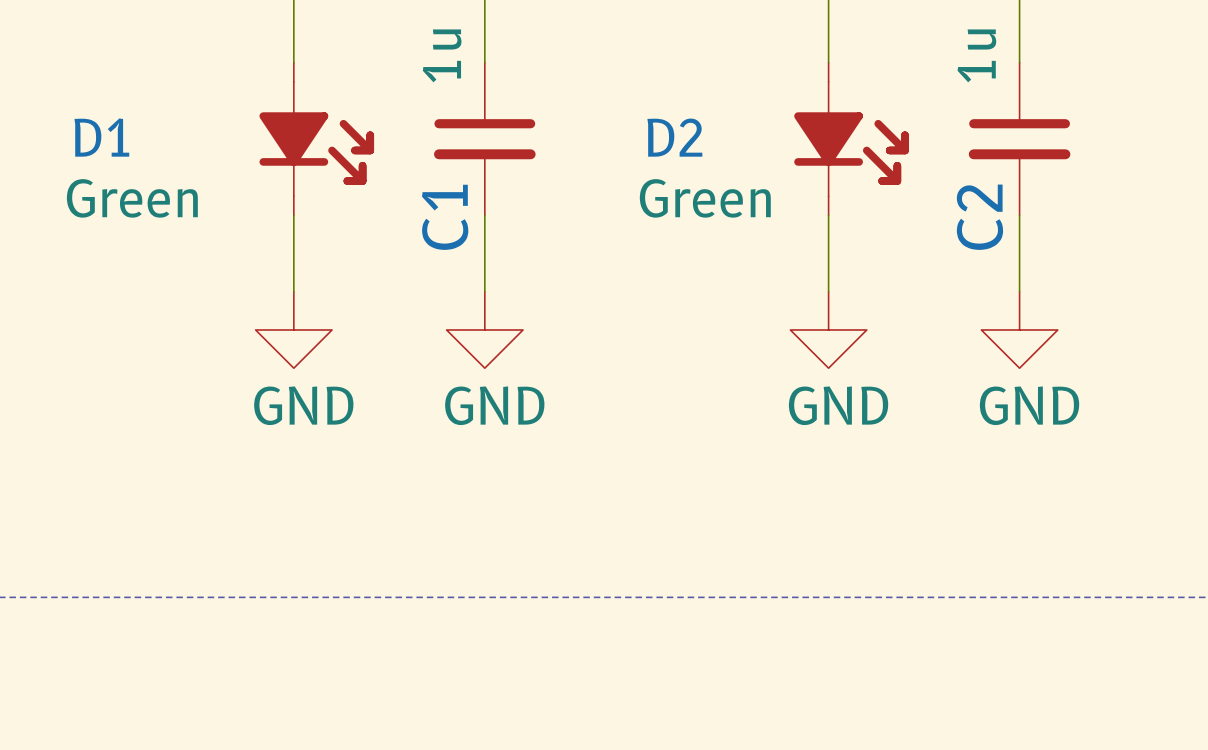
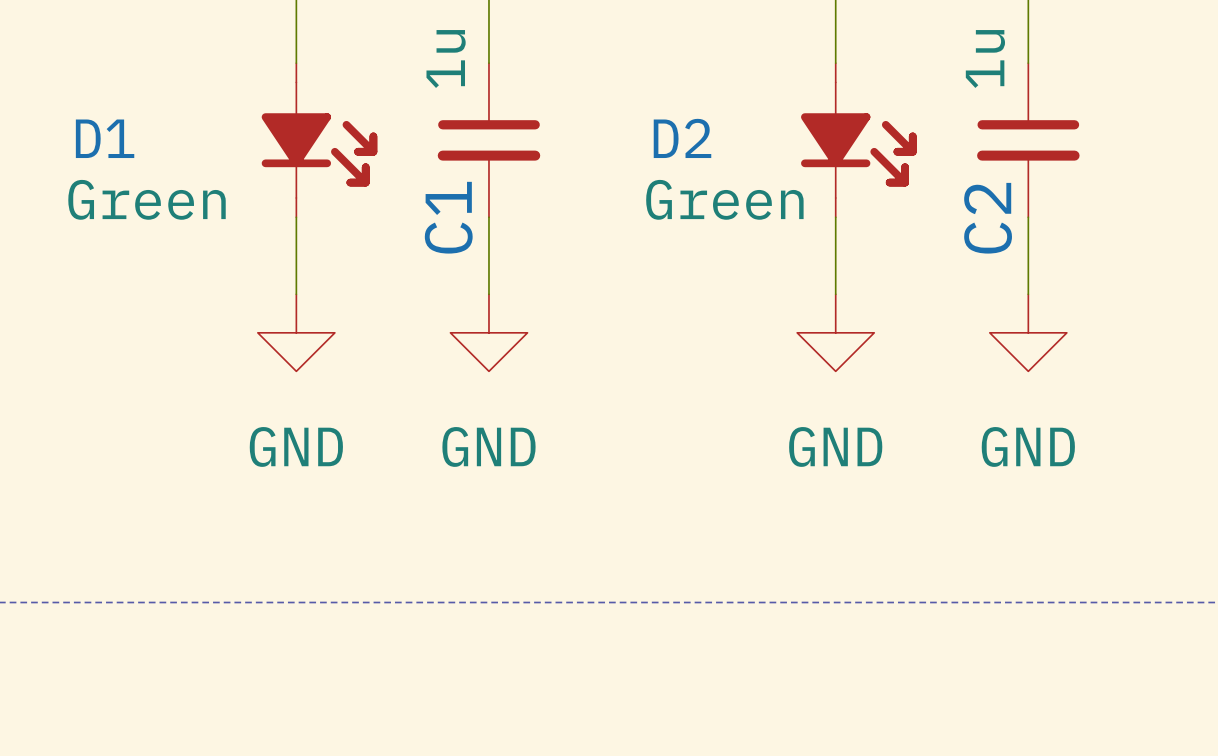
power symbol text position: GND (303, 405) -> GND (296, 446)
power symbol text position: GND (494, 405) -> GND (488, 446)
power symbol text position: GND (838, 405) -> GND (835, 446)
power symbol text position: GND (1029, 405) -> GND (1028, 446)

